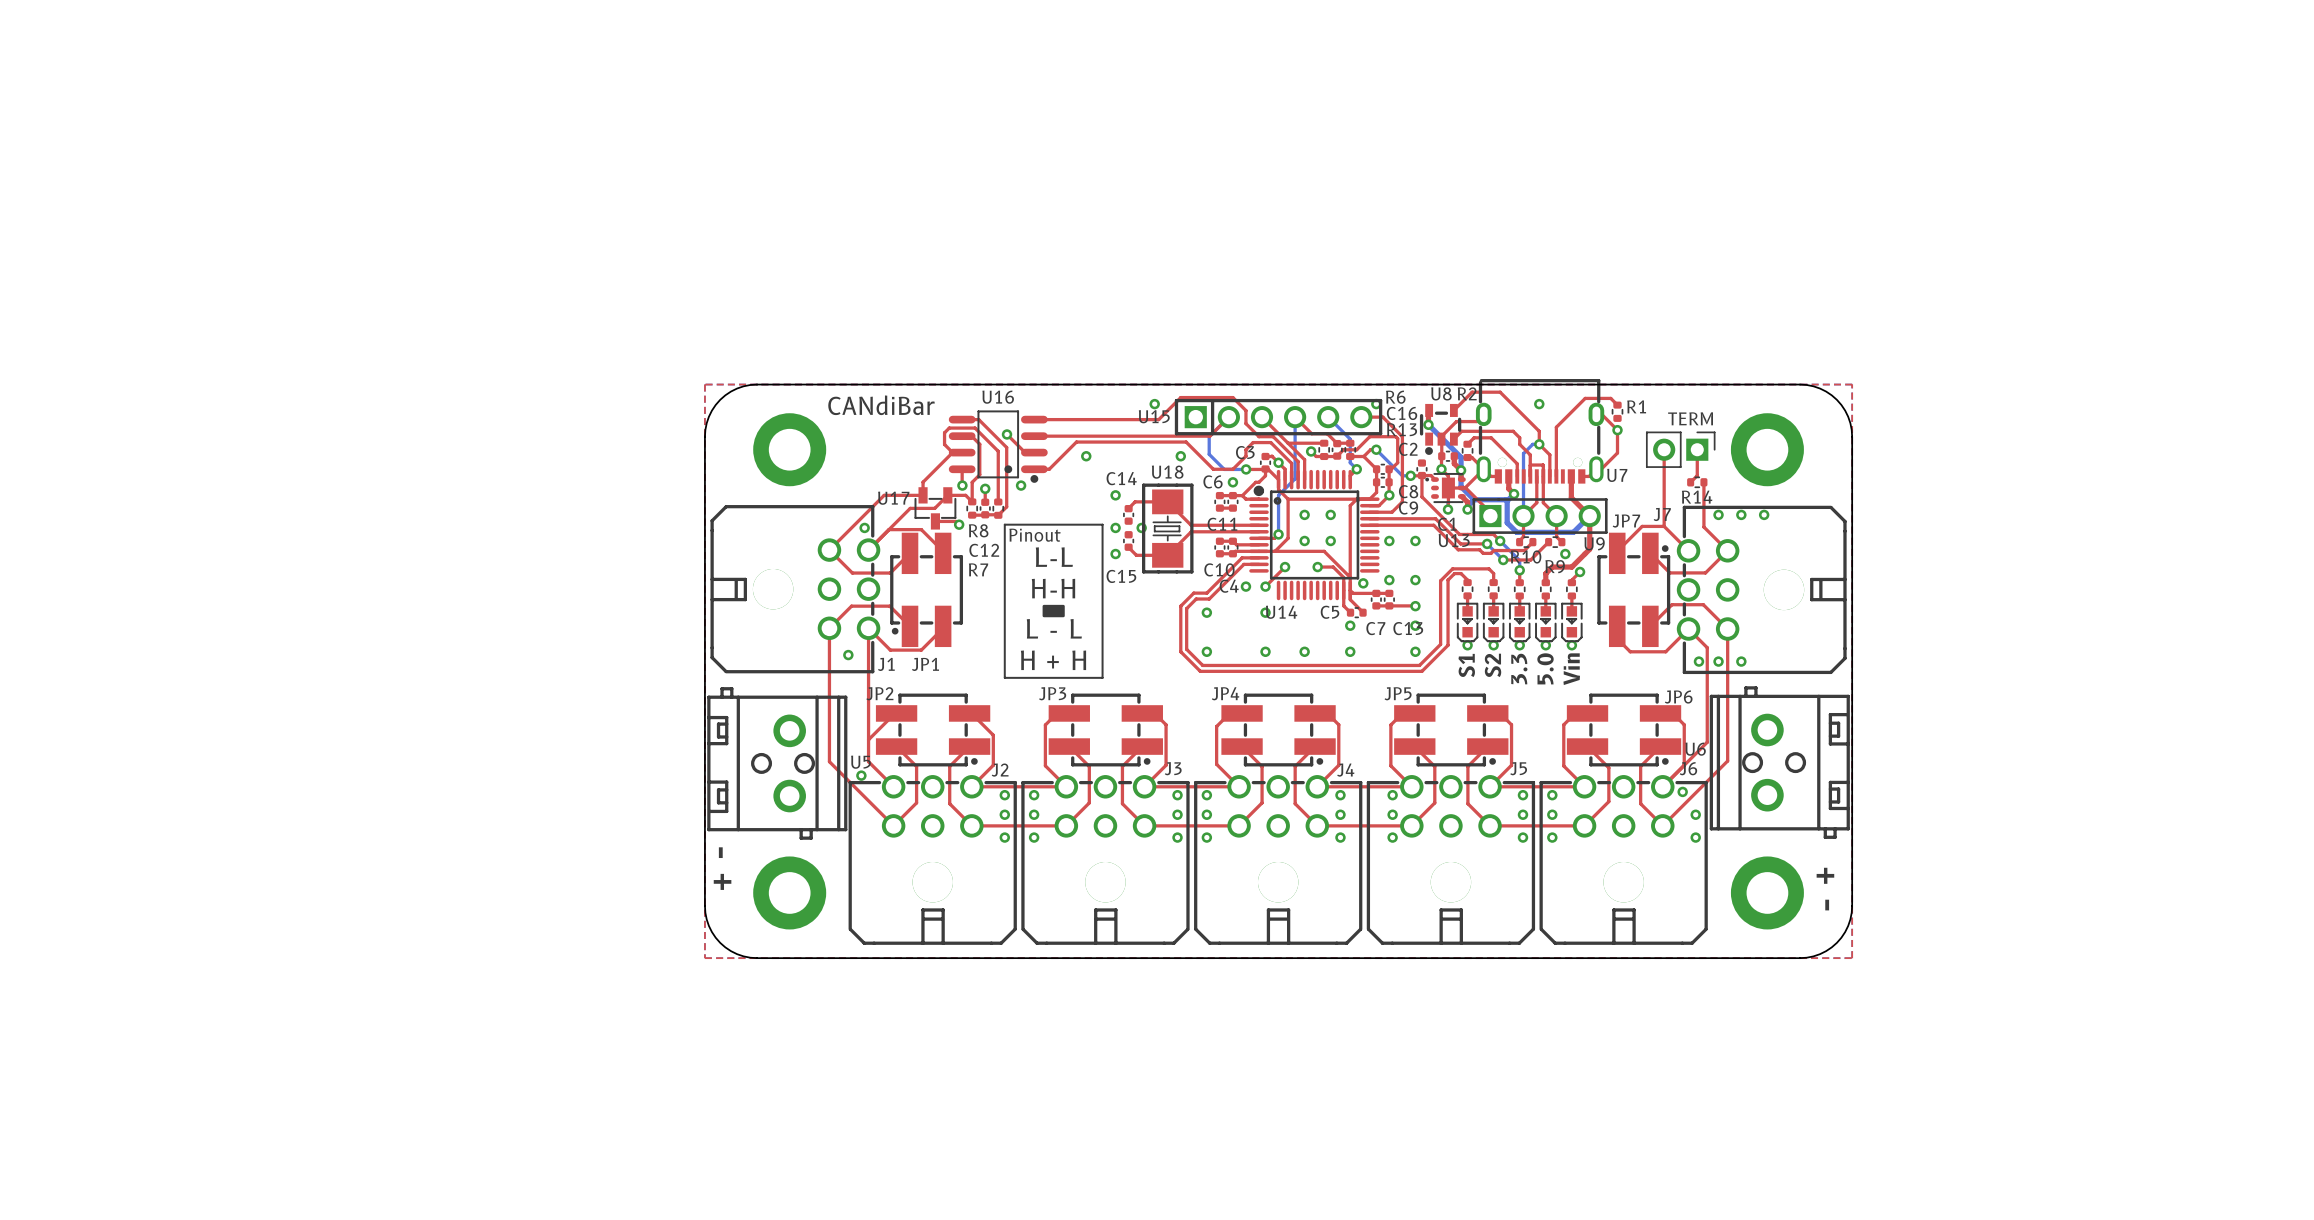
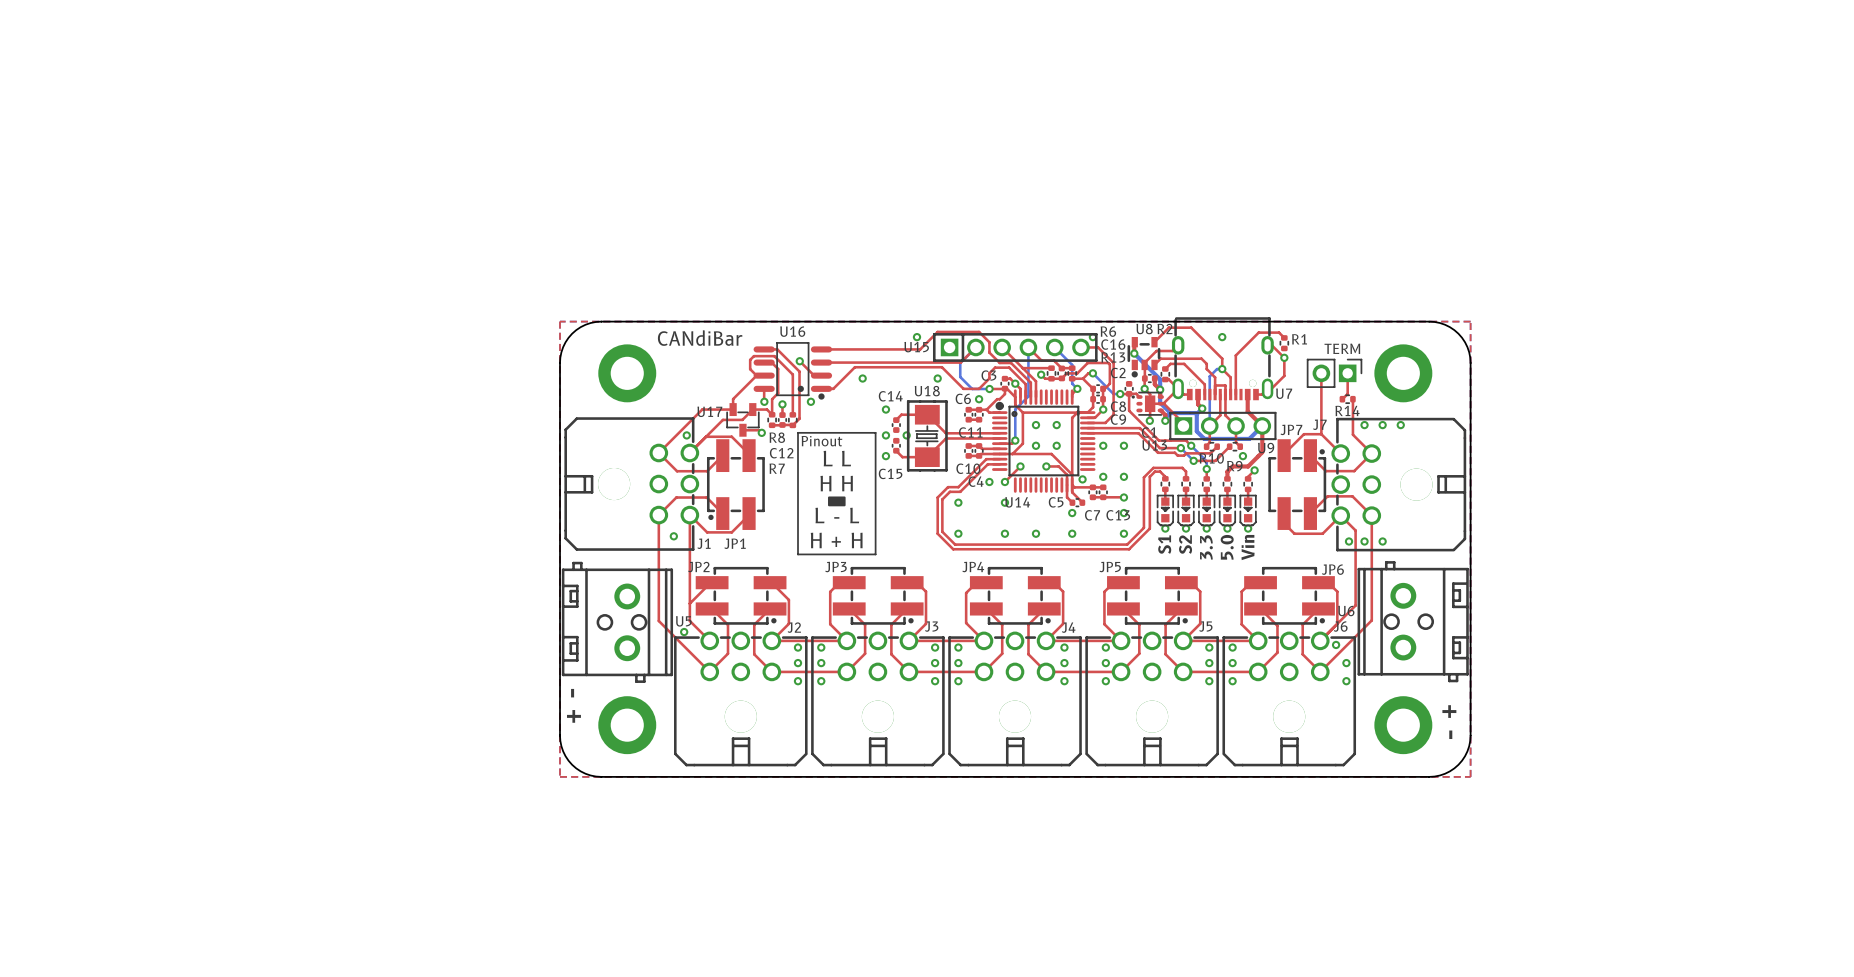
text: L-L (1054, 557) -> L L (837, 458)
text: H-H (1053, 588) -> H H (836, 483)

